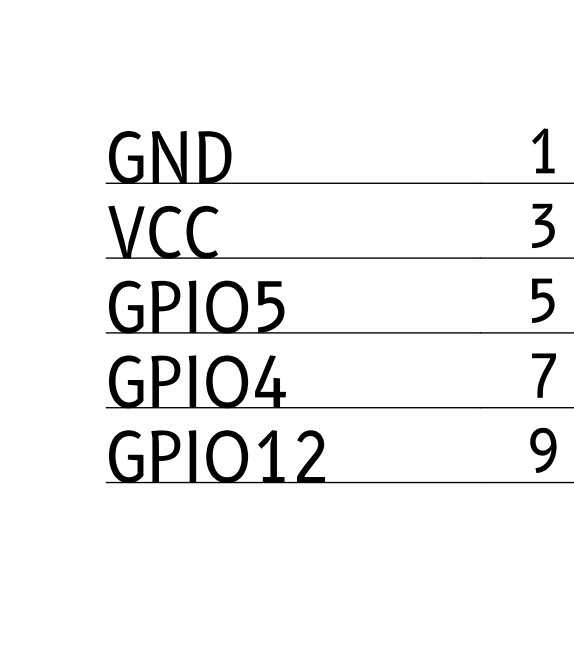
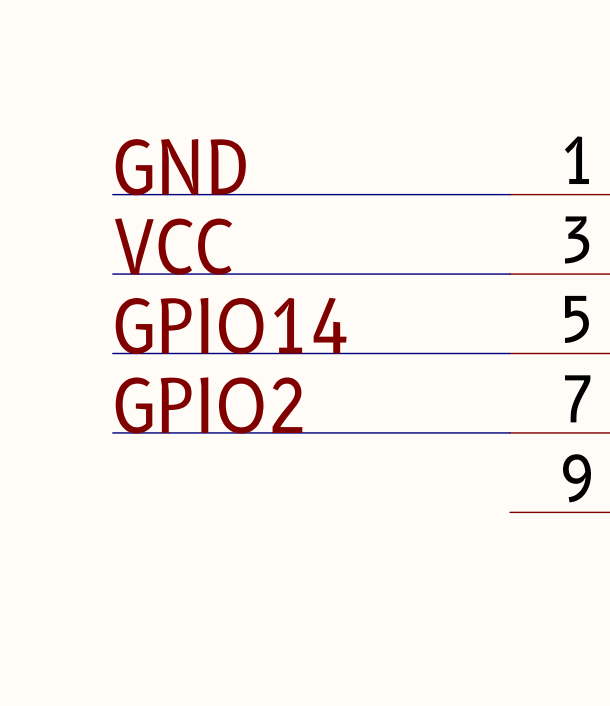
label: GPIO5 (196, 307) -> GPIO14 (231, 326)
label: GPIO4 (197, 381) -> GPIO2 (209, 405)
label: GPIO12 (216, 456) -> none
wire: (106, 482) (480, 482) -> none

